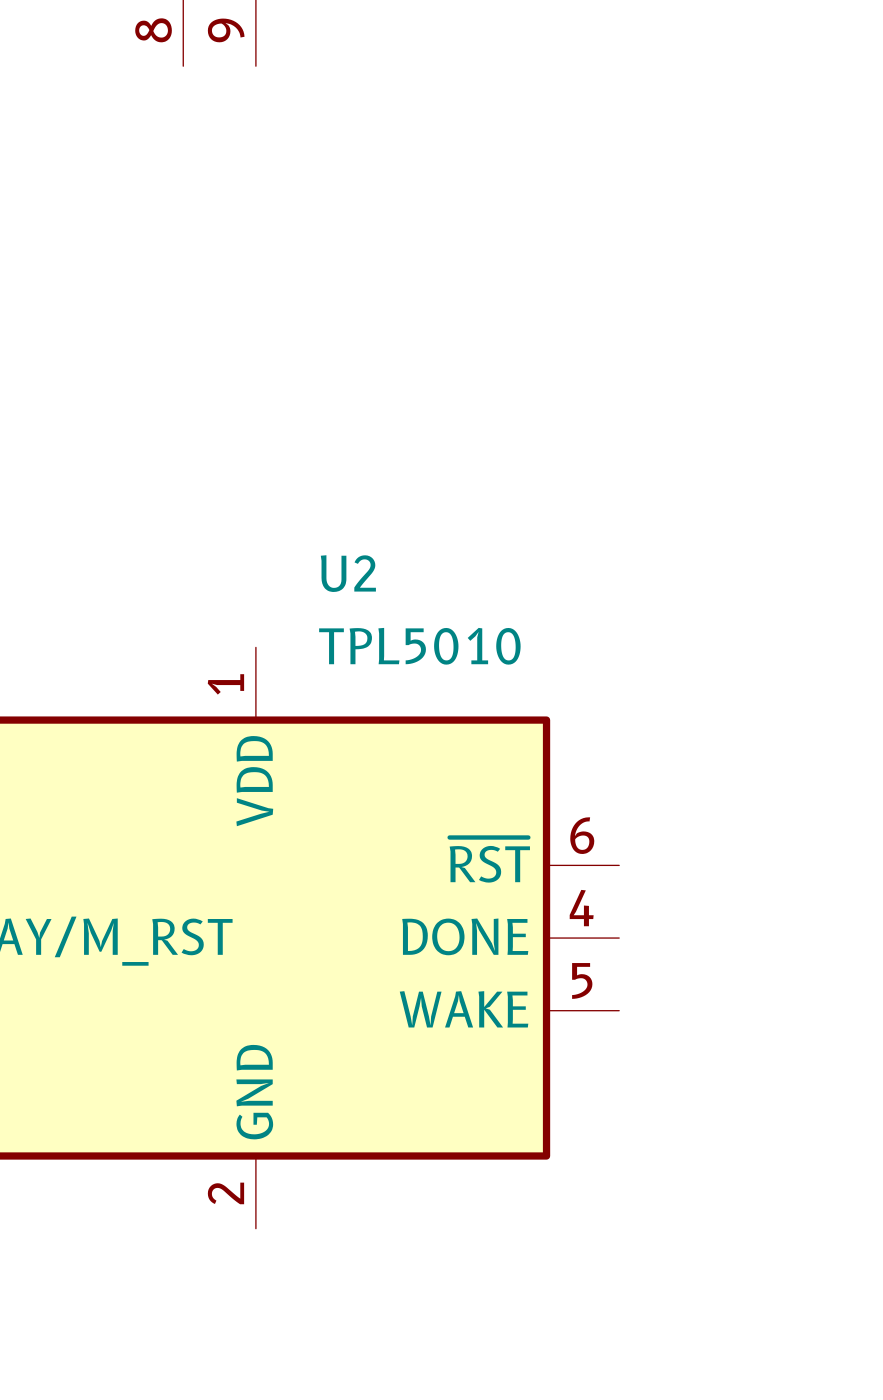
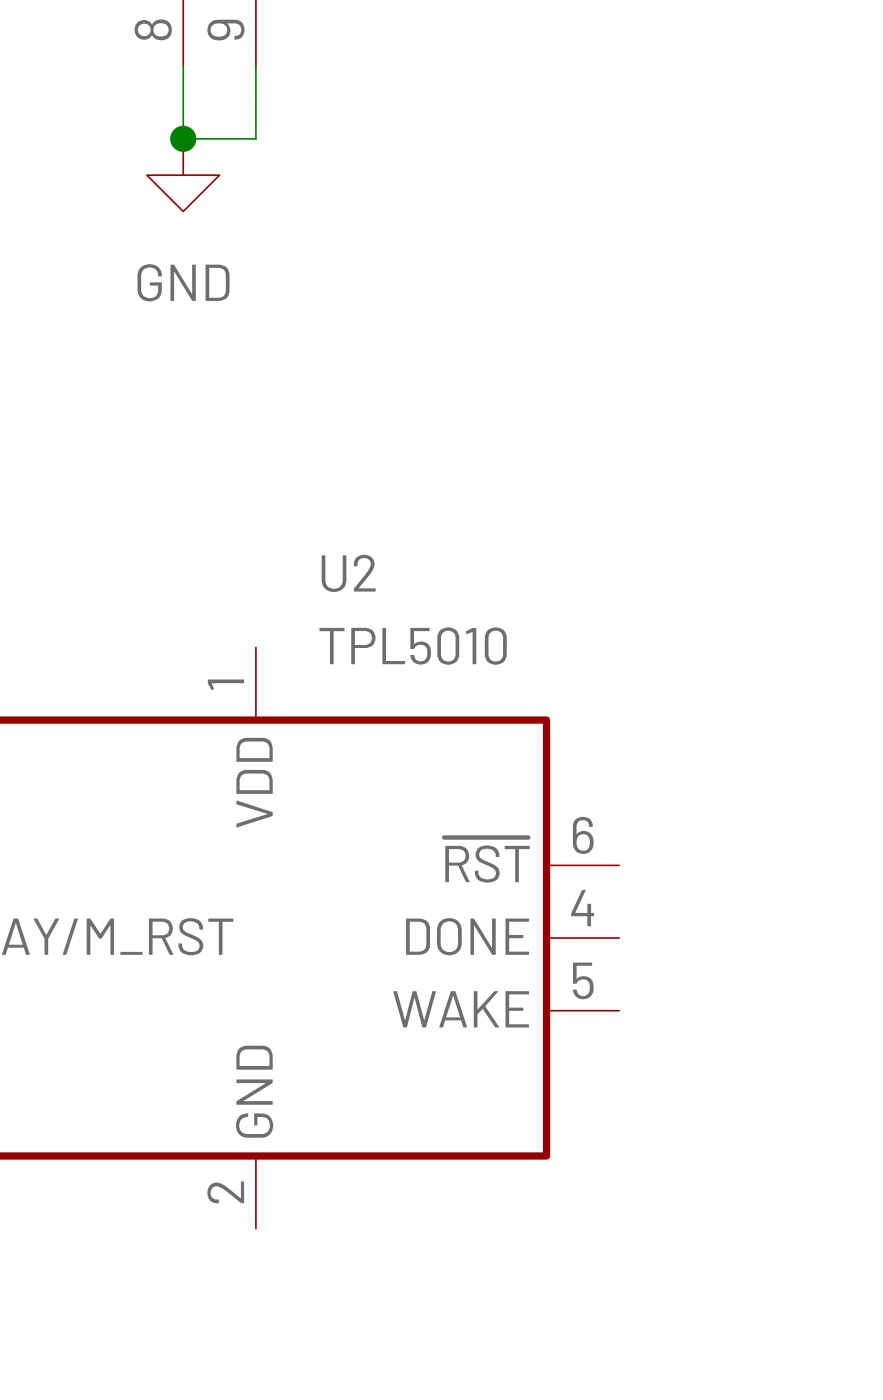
wire: none -> (183, 66) (183, 138) (255, 138) (255, 66)
junction: none -> (183, 138)
power symbol: none -> GND (183, 175)

